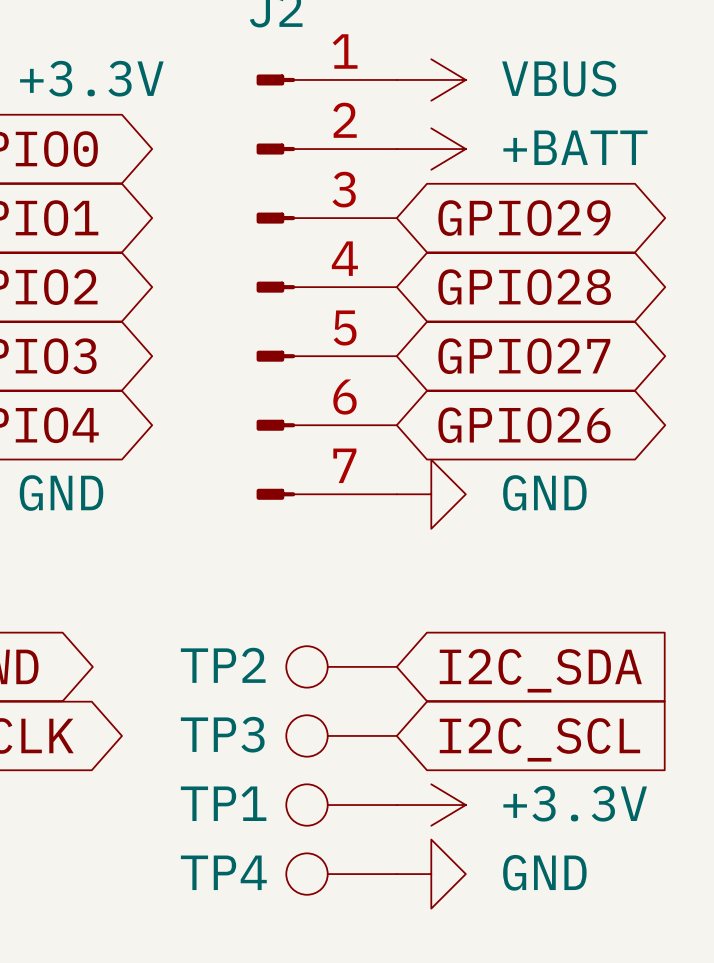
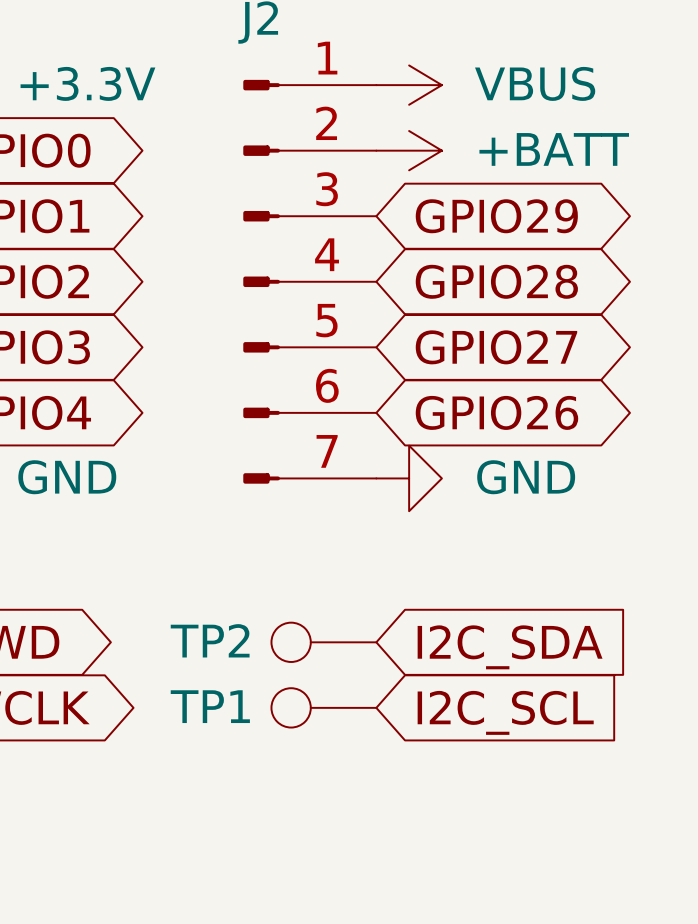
TP3 name: TP3 (222, 734) -> TP1 (210, 706)
TP1: (341, 805) -> none
power symbol: +3.3V (431, 805) -> none
TP4: (341, 874) -> none
power symbol: GND (431, 874) -> none

